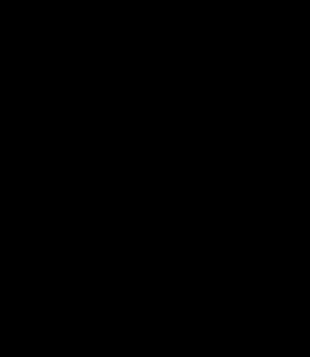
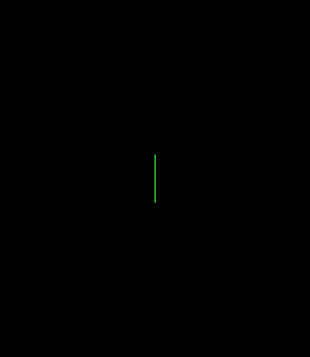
wire: none -> (155, 155) (155, 202)

